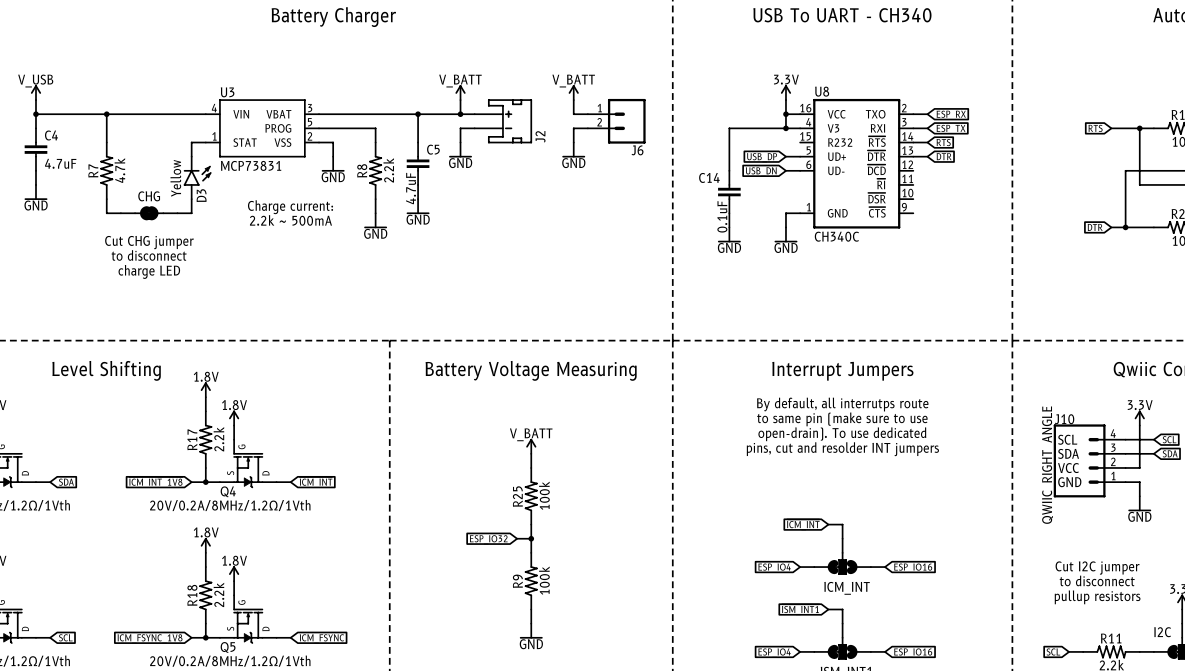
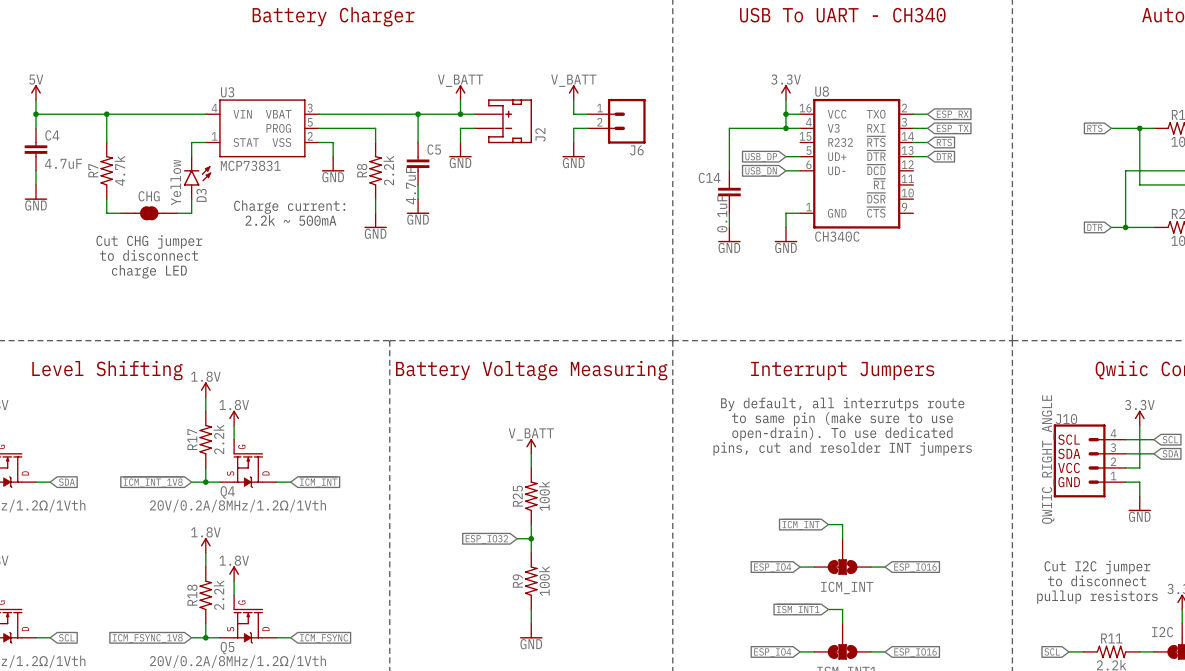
power symbol: V_USB (35, 92) -> 5V (35, 92)

